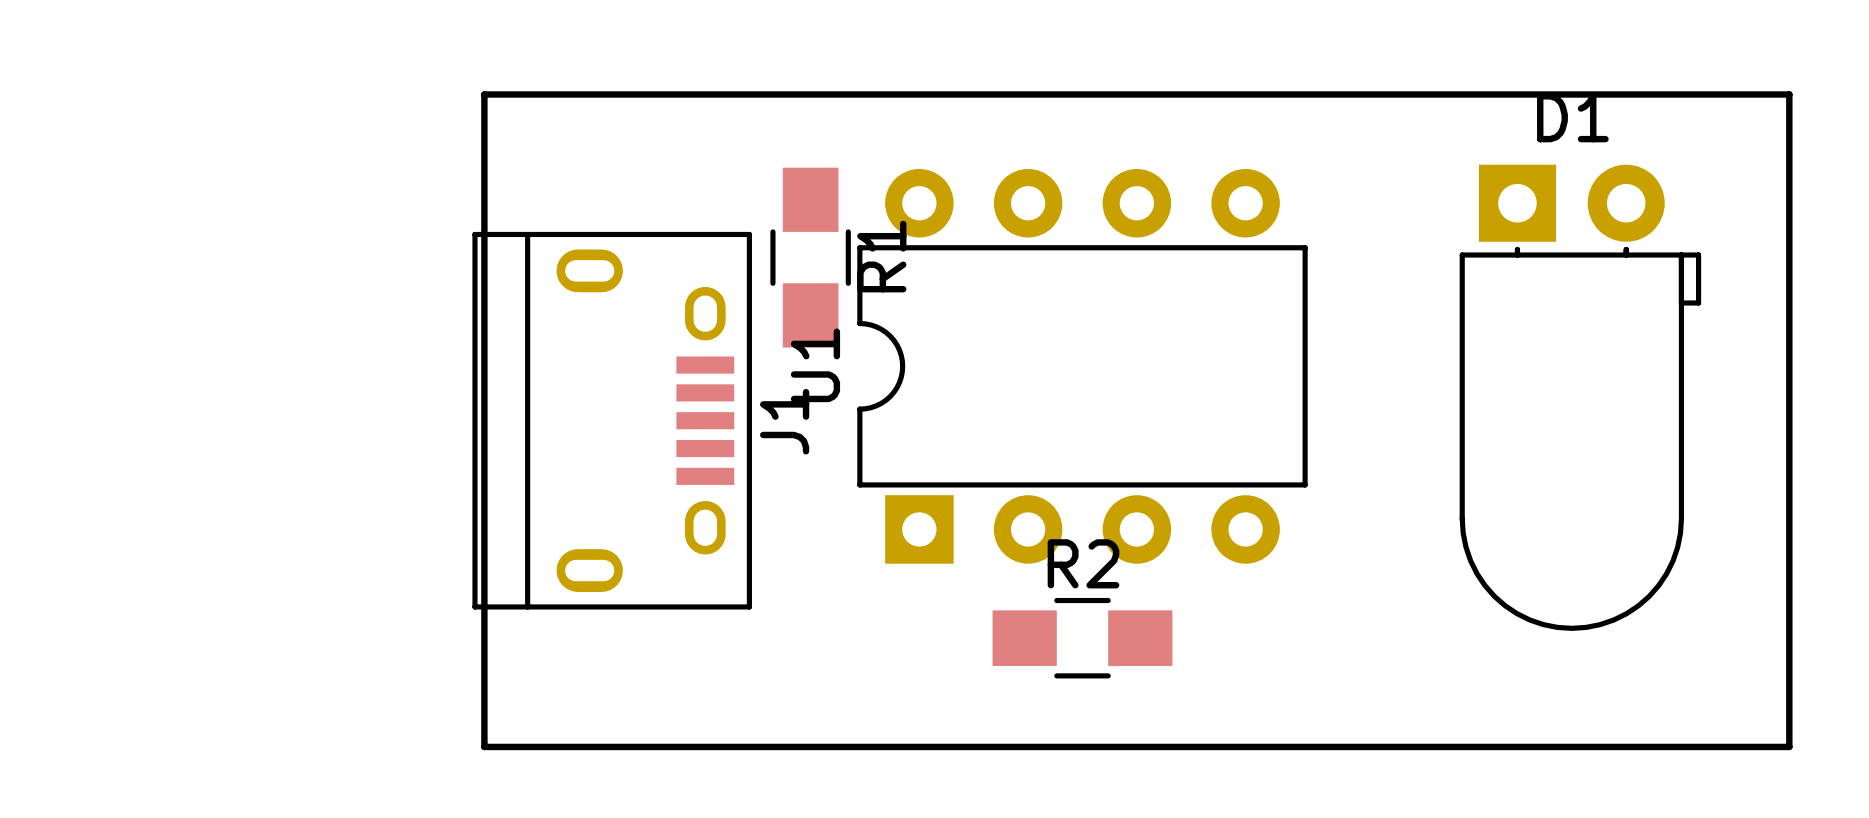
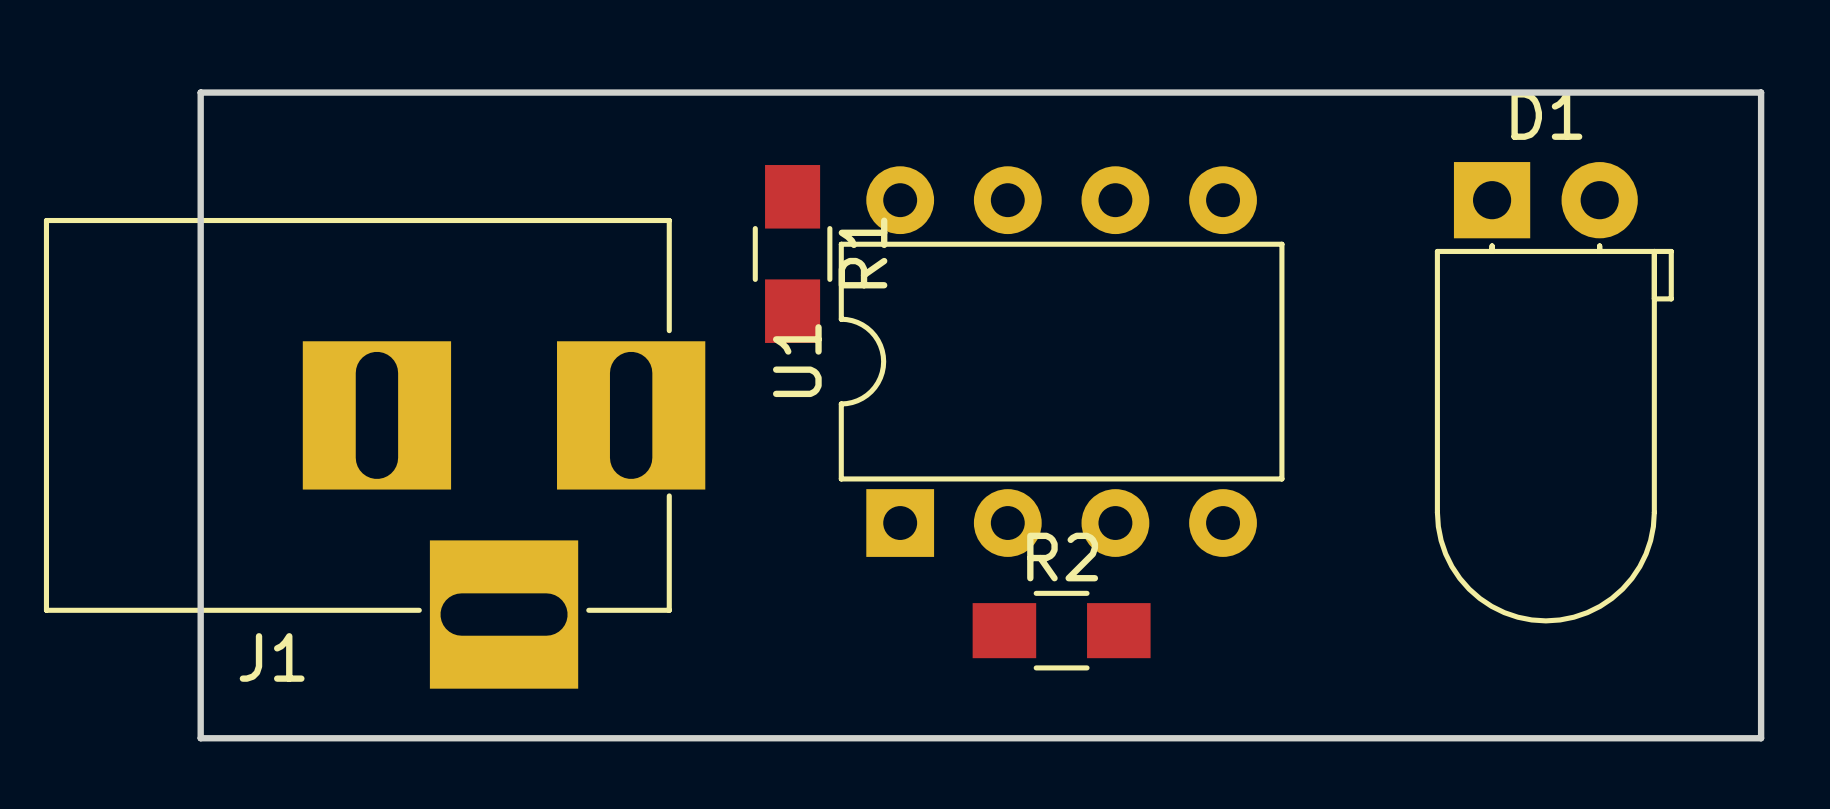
board edge: (484, 94) (484, 746) -> (469, 92) (200, 92) (200, 738) (469, 738)
J1 footprint: [472, 231, 752, 610] -> [43, 217, 706, 689]
J1 name position: J1 (784, 421) -> J1 (272, 657)

